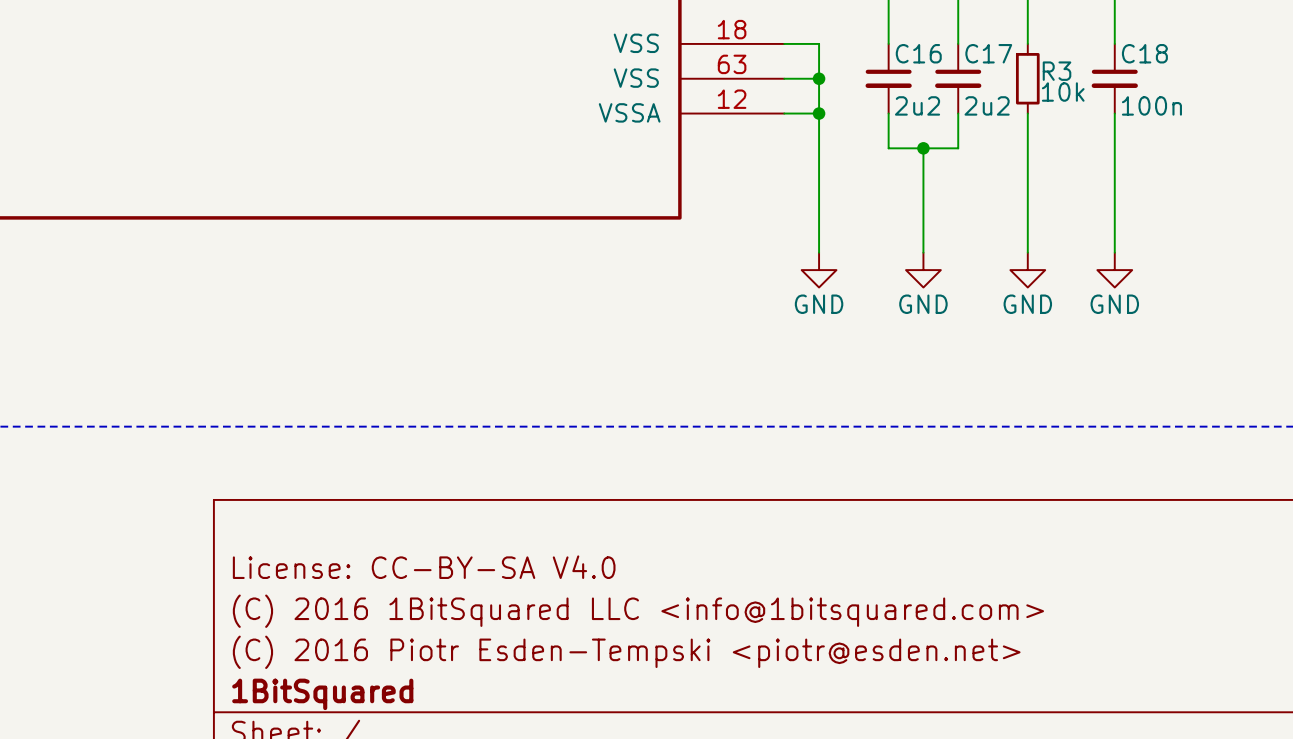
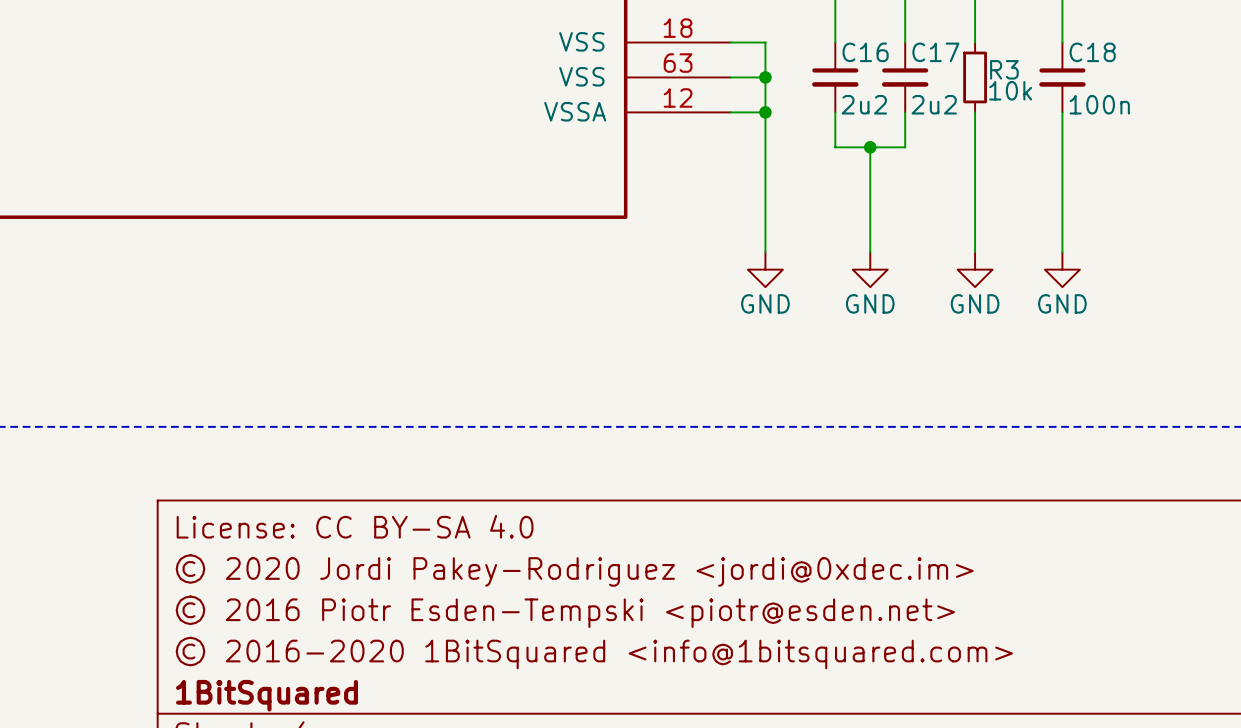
title block: none -> License: CC BY-SA 4.0 (355, 526)
title block: License: CC-BY-SA V4.0 (424, 567) -> © 2020 Jordi Pakey-Rodriguez <jordi@0xdec.im> (574, 570)
title block: (C) 2016 1BitSquared LLC <info@1bitsquared.com> (638, 611) -> © 2016 Piotr Esden-Tempski <piotr@esden.net> (565, 611)
title block: (C) 2016 Piotr Esden-Tempski <piotr@esden.net> (626, 652) -> © 2016-2020 1BitSquared <info@1bitsquared.com> (594, 653)

